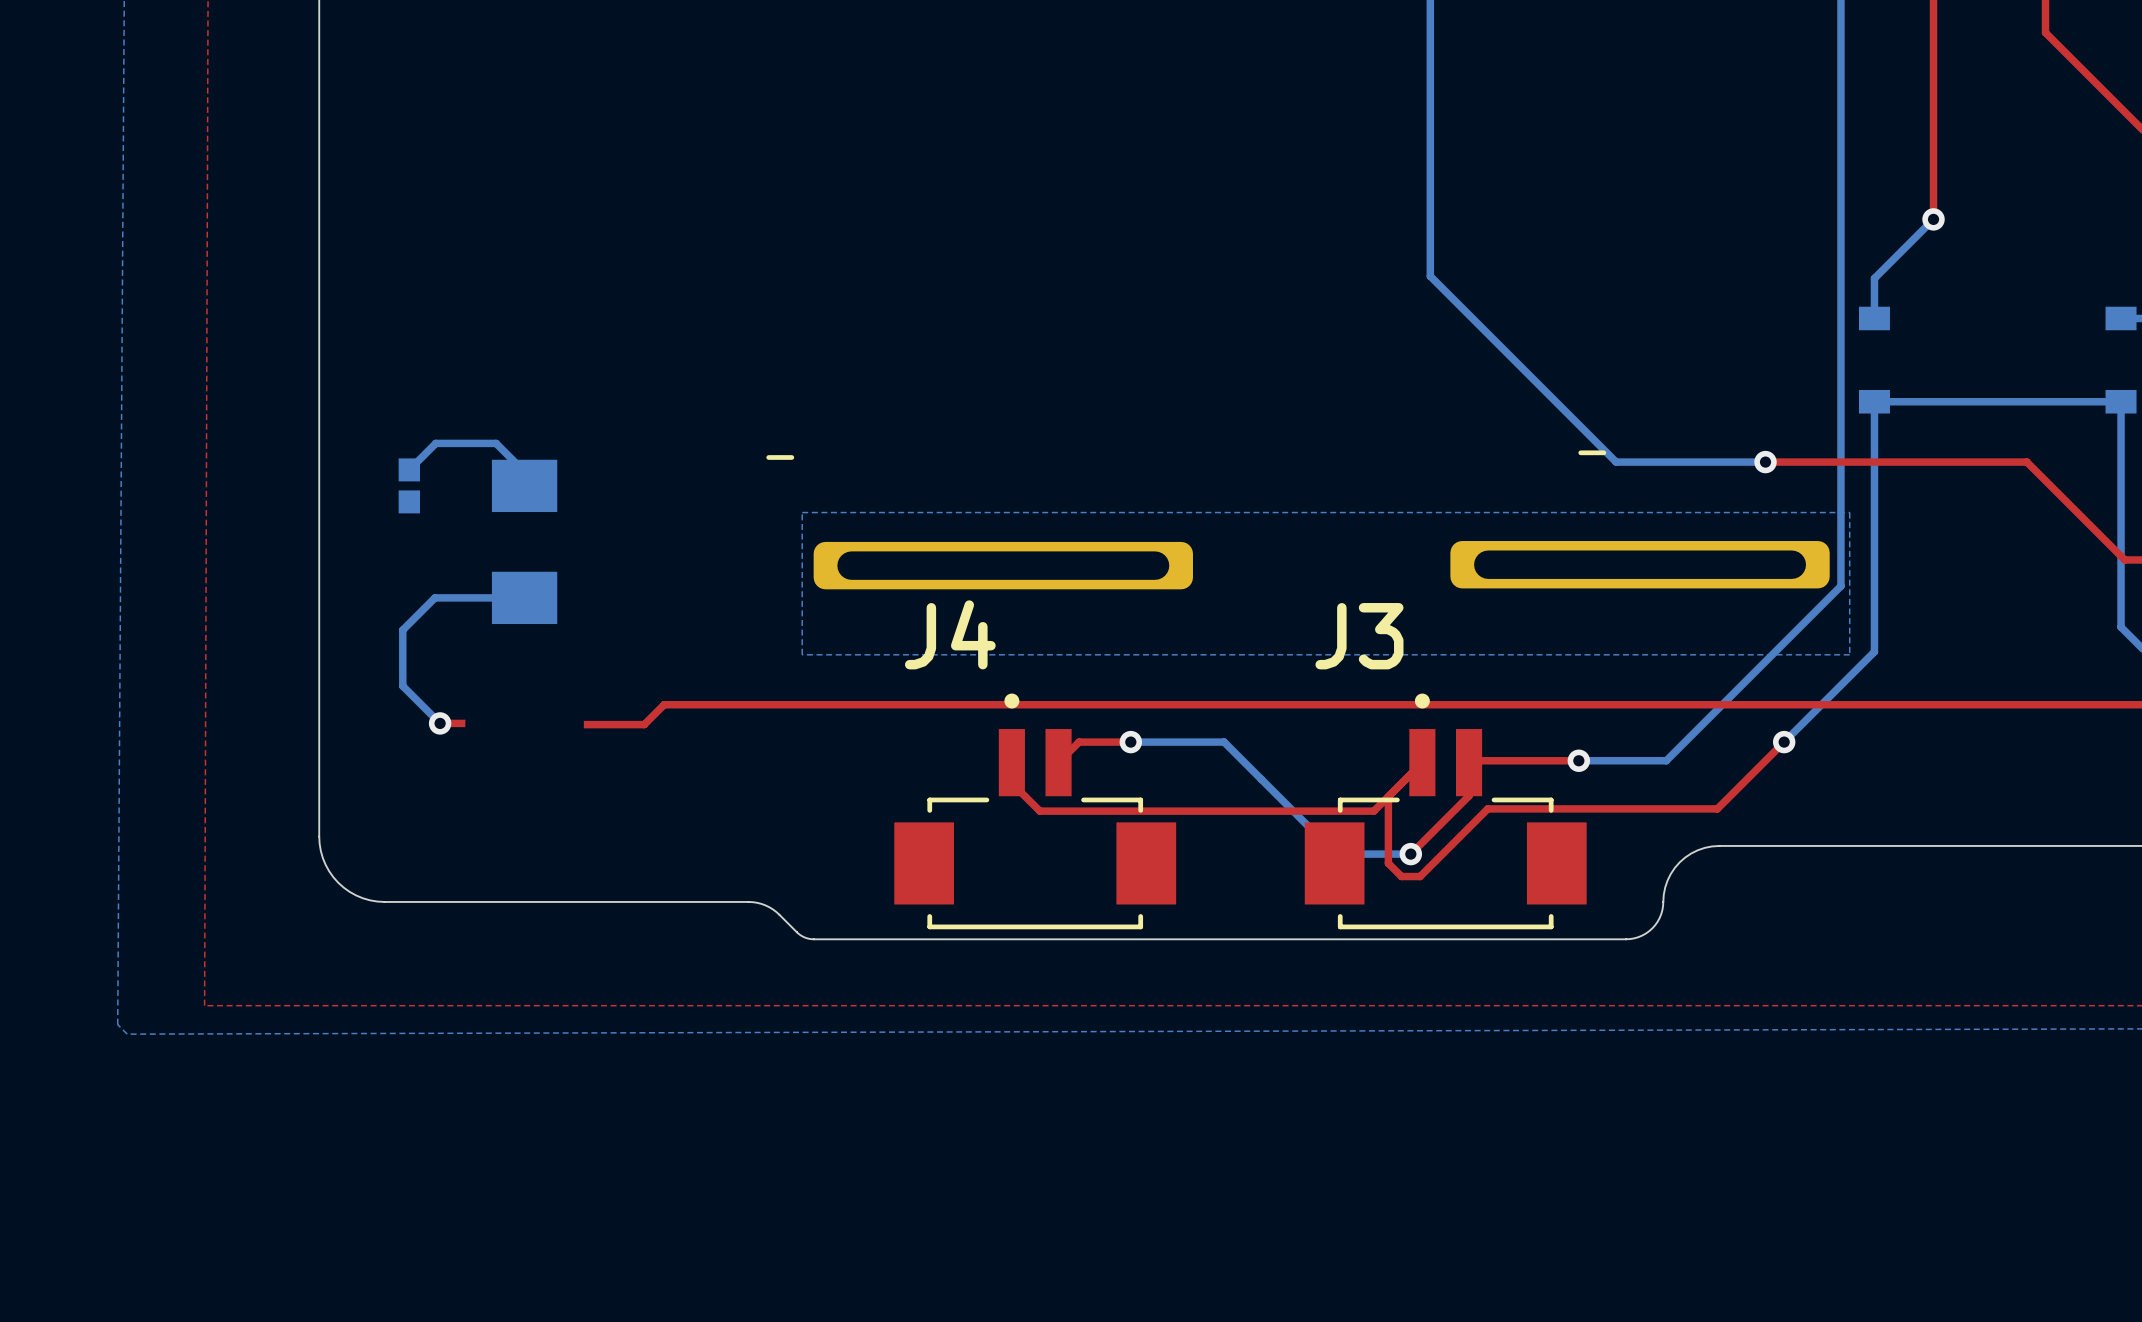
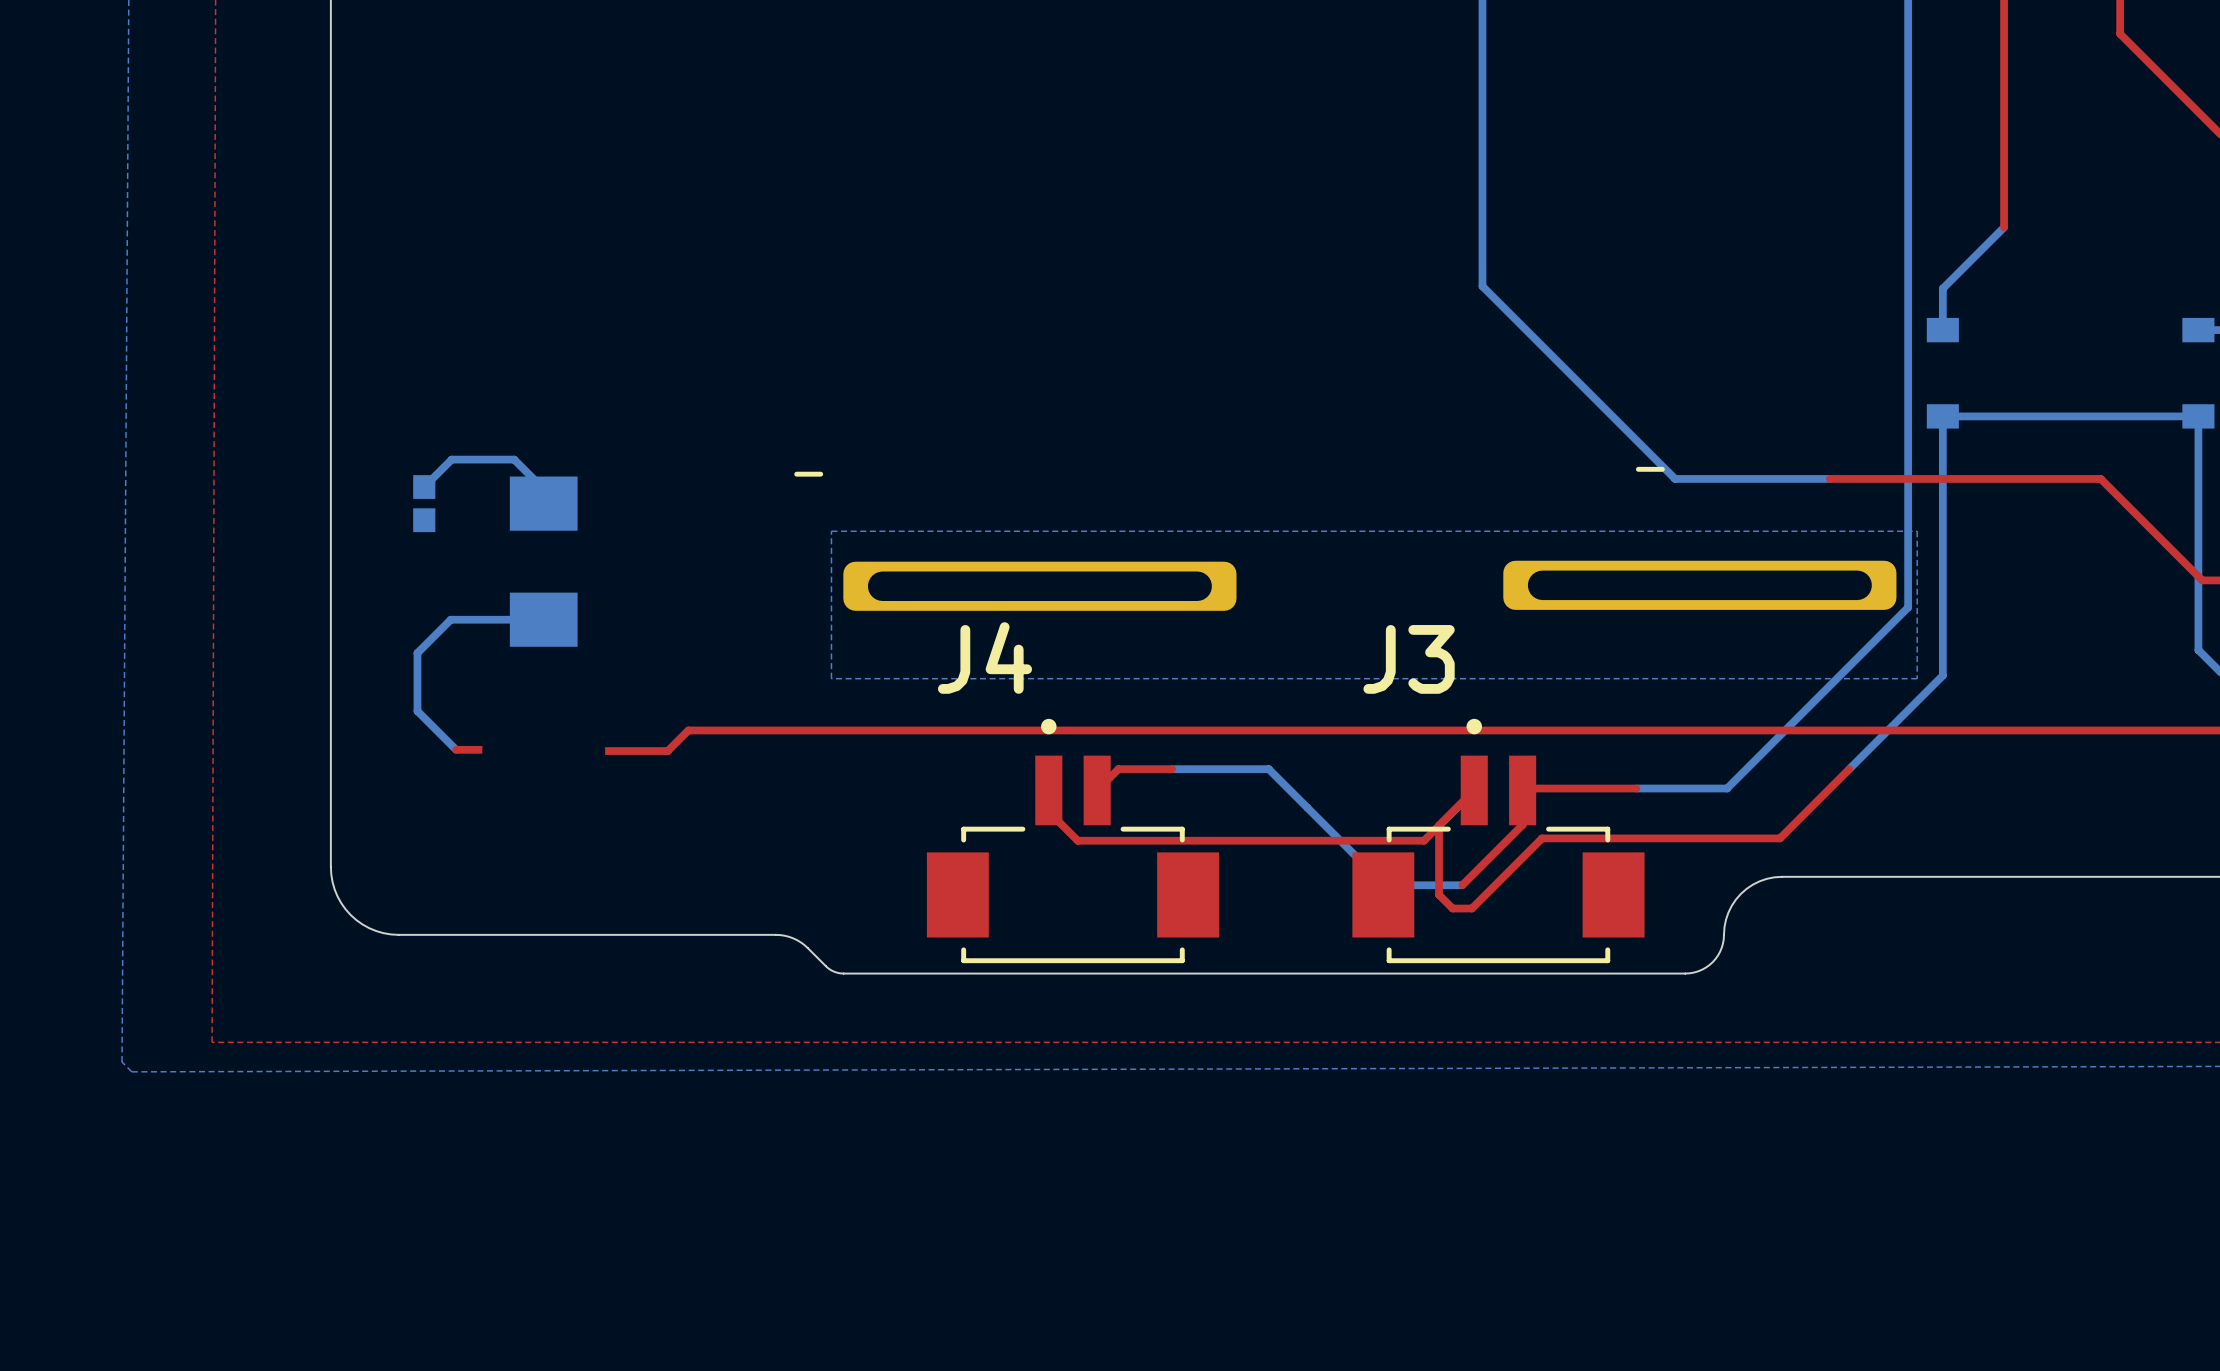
via: (1933, 219) -> none
via: (1765, 462) -> none
via: (440, 723) -> none
via: (1130, 742) -> none
via: (1784, 742) -> none
via: (1578, 760) -> none
via: (1410, 854) -> none

